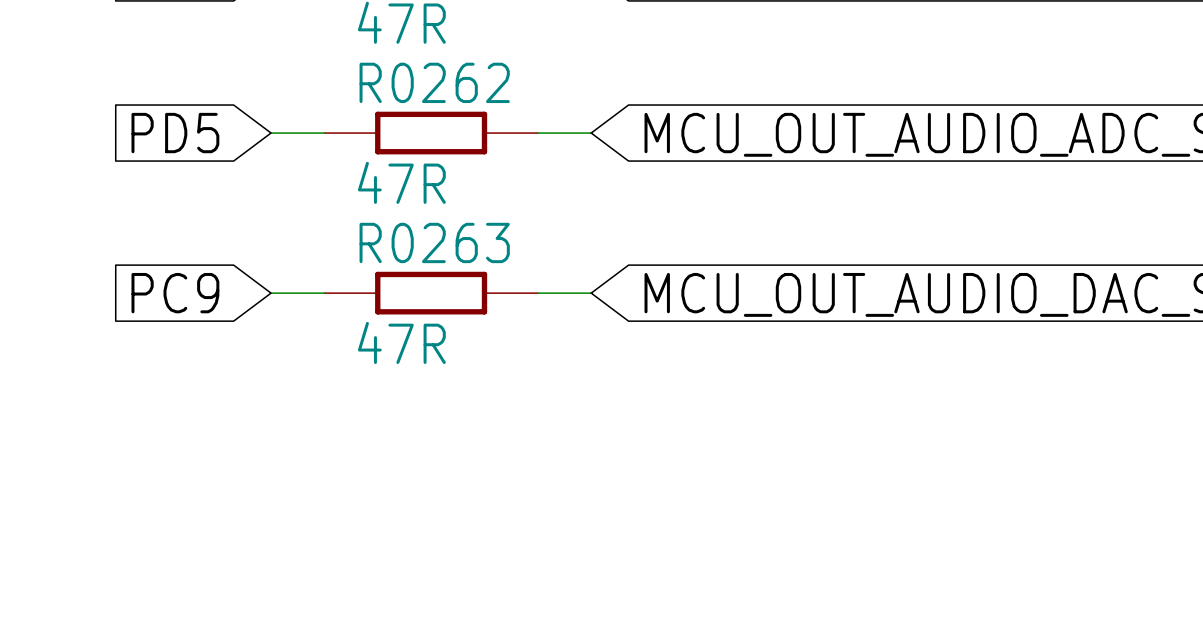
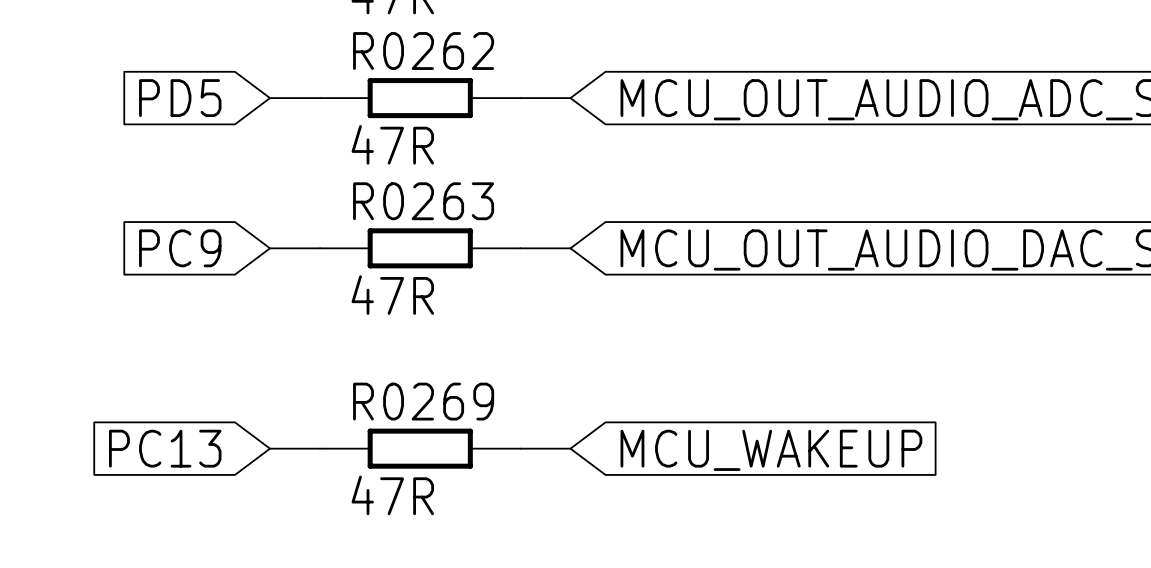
global label: none -> PC13 (165, 448)
wire: none -> (270, 448) (320, 448)
R0269: none -> 47R (420, 448)
wire: none -> (520, 448) (570, 448)
global label: none -> MCU_WAKEUP (771, 450)

